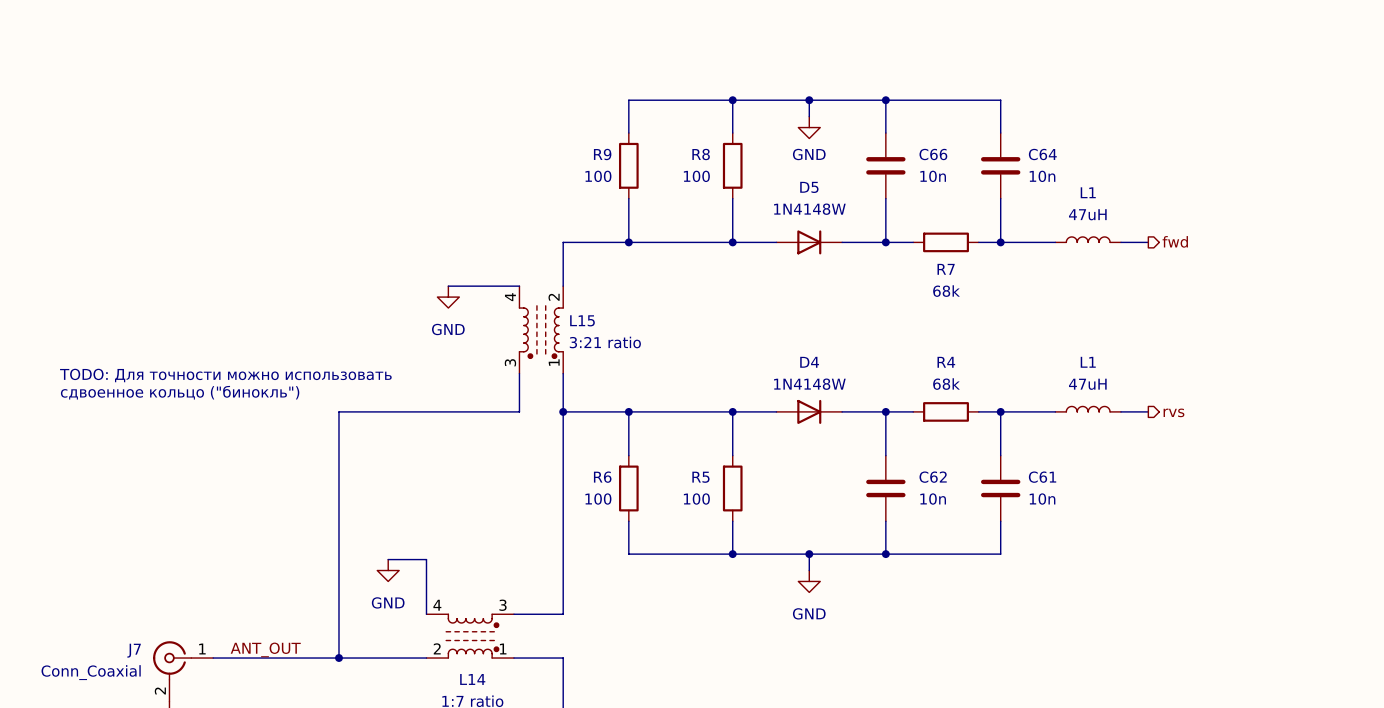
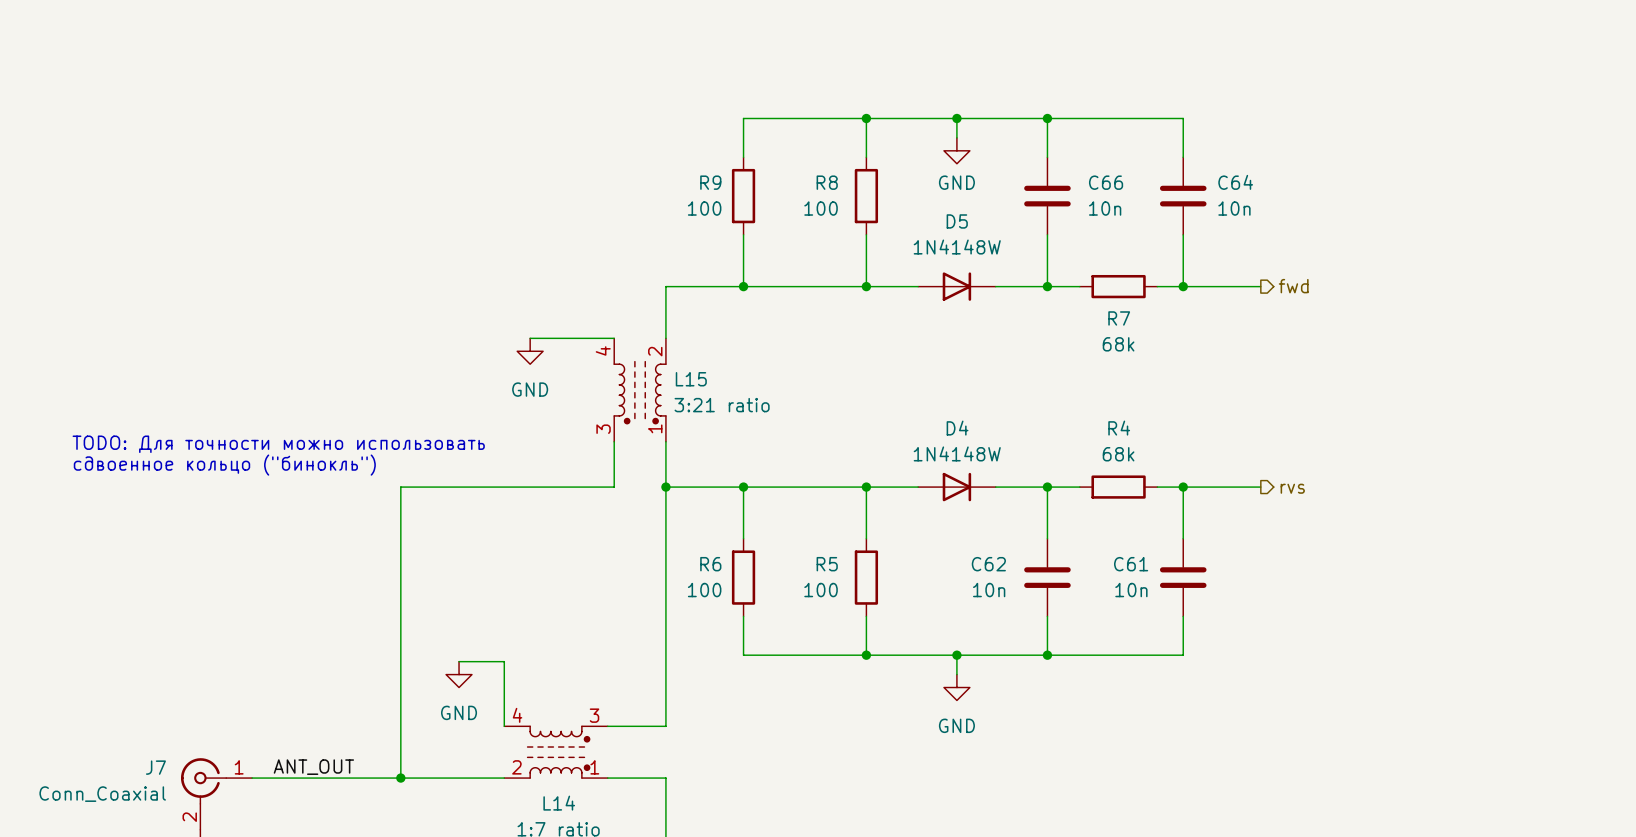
L1: 47uH (1088, 239) -> none
hierarchical label position: fwd (1175, 241) -> fwd (1293, 286)
wire: (1121, 242) (1148, 242) -> none
L1: 47uH (1088, 409) -> none
wire: (1121, 411) (1148, 411) -> none
hierarchical label position: rvs (1173, 412) -> rvs (1292, 488)
C62 name position: C62 (933, 477) -> C62 (988, 564)
C61 name position: C61 (1042, 477) -> C61 (1131, 564)
C62 value position: 10n (933, 499) -> 10n (989, 590)
C61 value position: 10n (1042, 499) -> 10n (1131, 590)

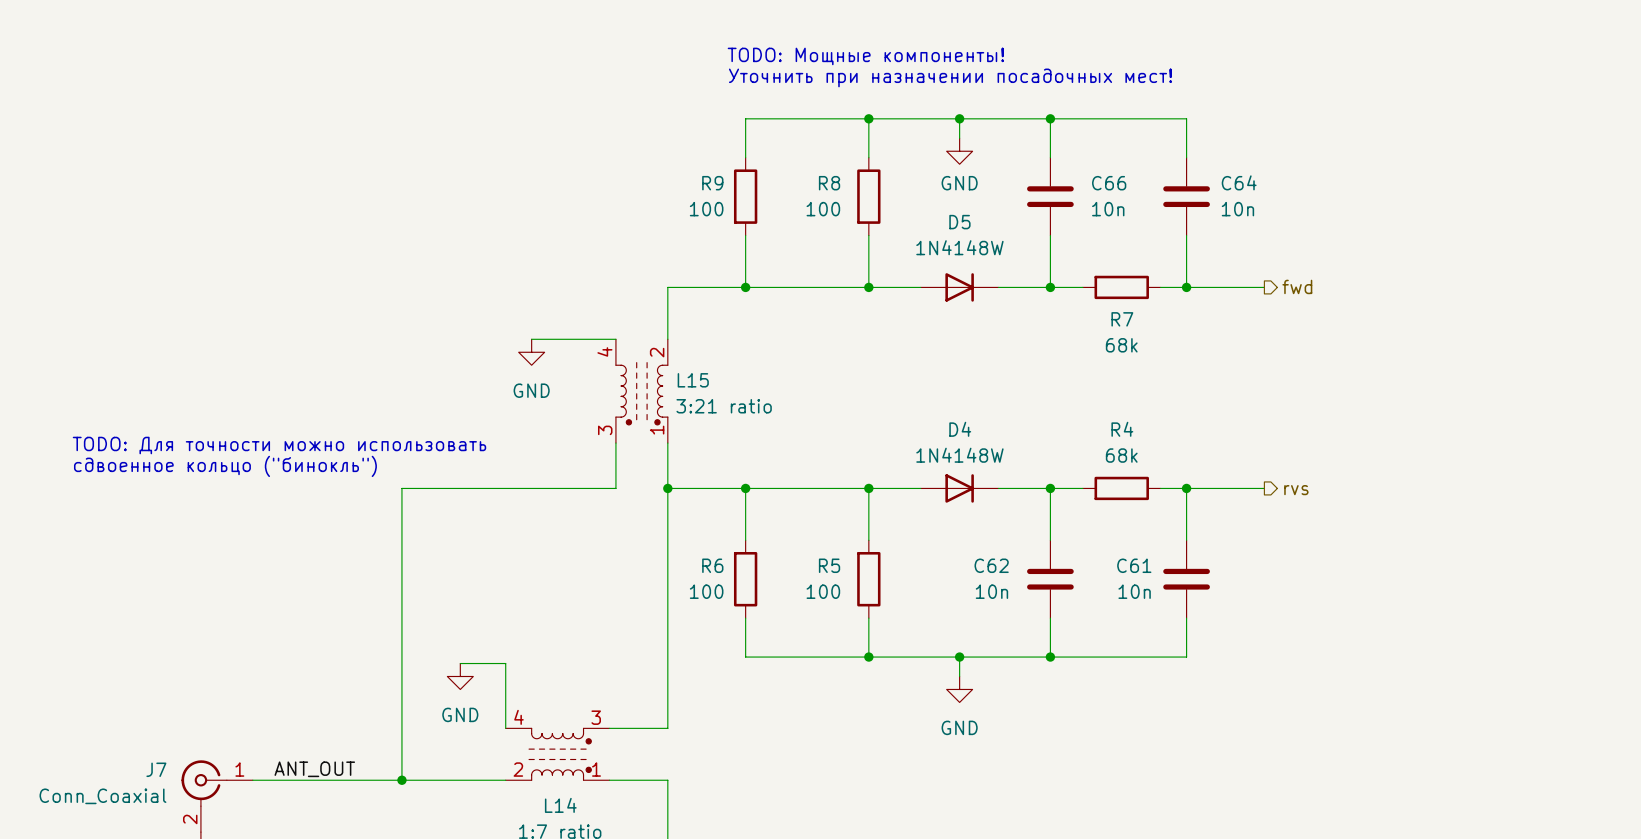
text: none -> TODO: Мощные компоненты! (865, 56)
text: none -> Уточнить при назначении посадочных мест! (950, 77)

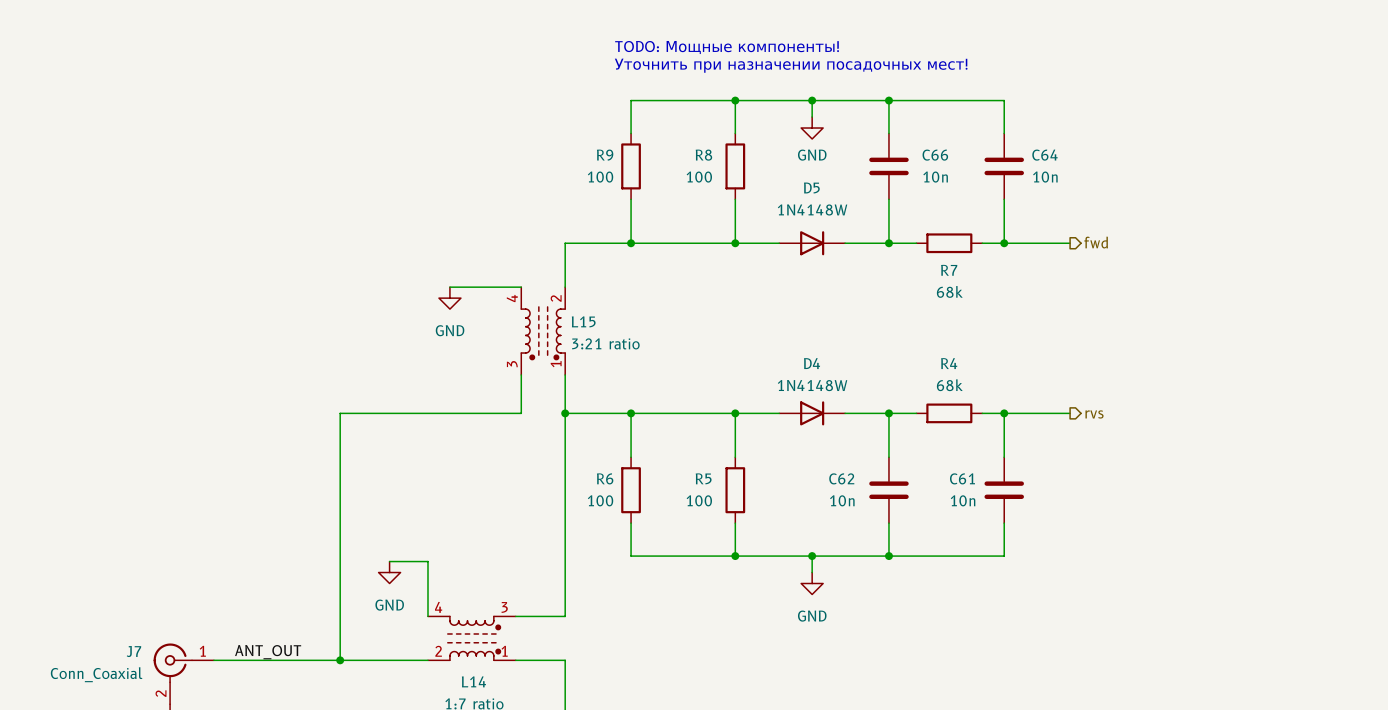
text: TODO: Для точности можно использовать (279, 445) -> none
text: сдвоенное кольцо ("бинокль") (225, 466) -> none

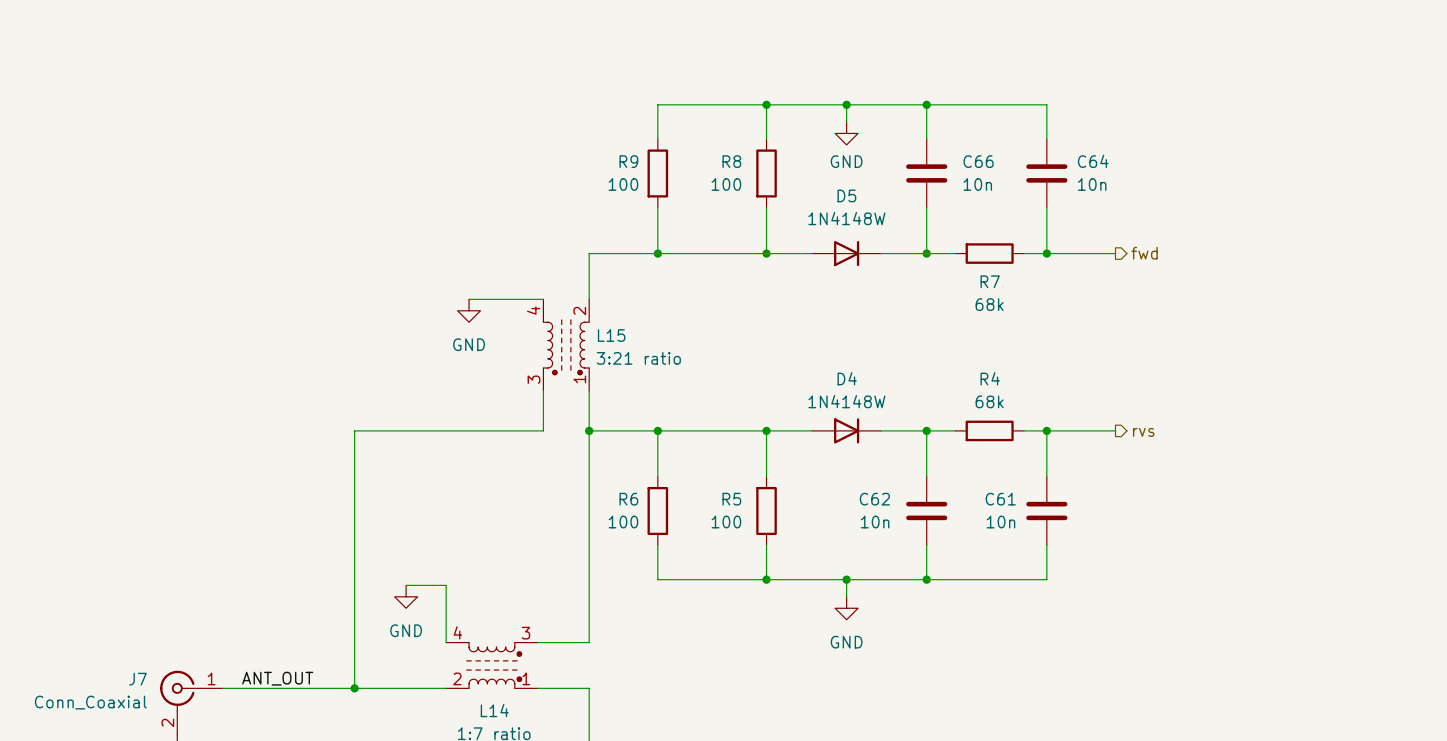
text: TODO: Мощные компоненты! (727, 47) -> none
text: Уточнить при назначении посадочных мест! (791, 65) -> none

